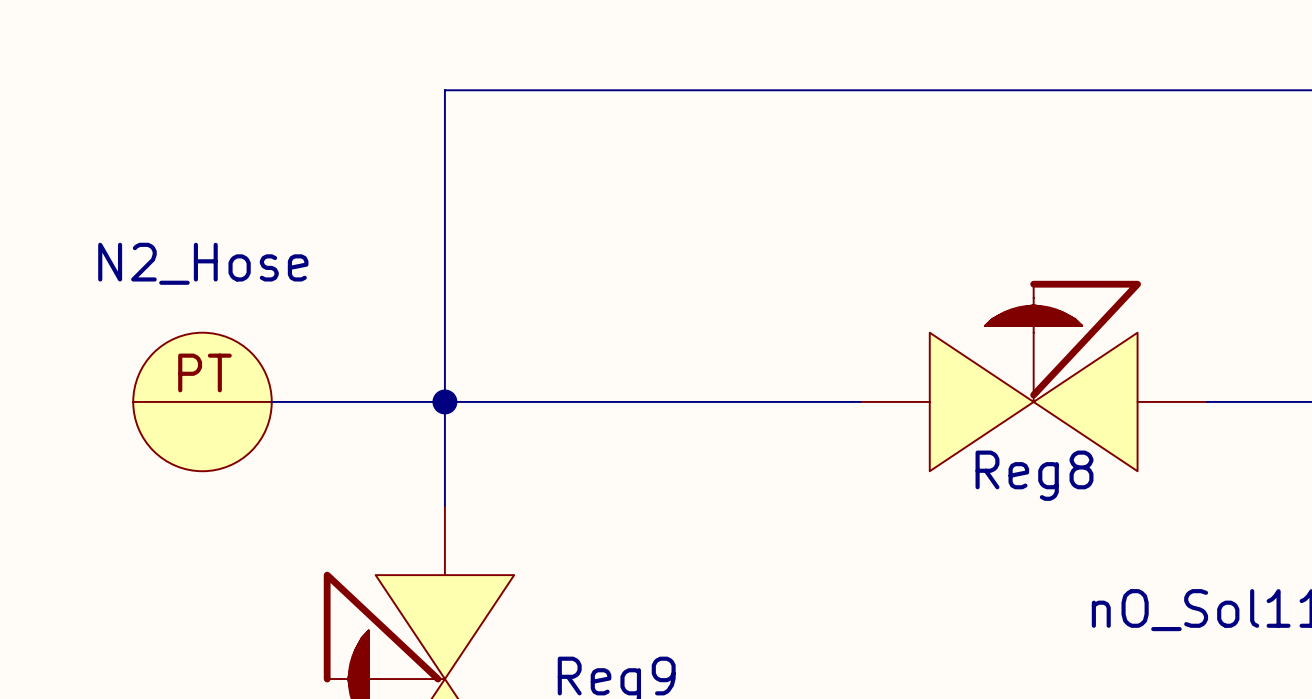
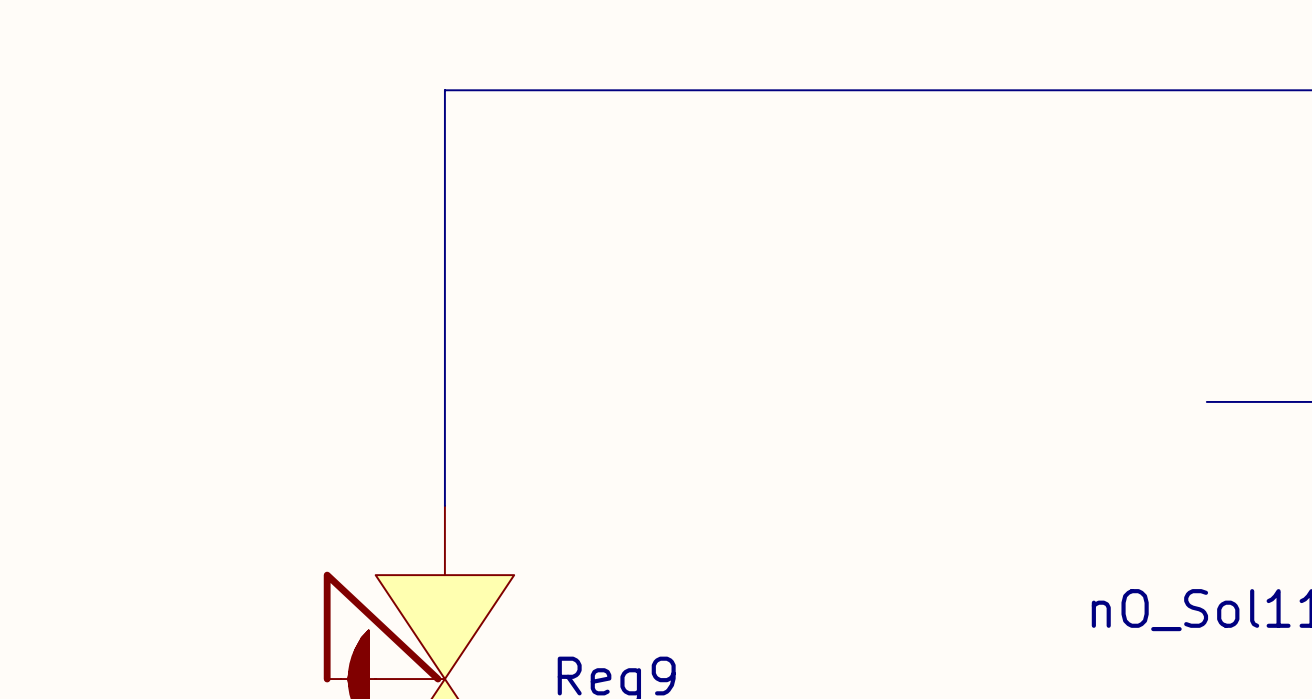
Reg8: (1033, 376) -> none
N2_Hose: (202, 401) -> none
wire: (271, 401) (860, 401) -> none
junction: (444, 401) -> none

